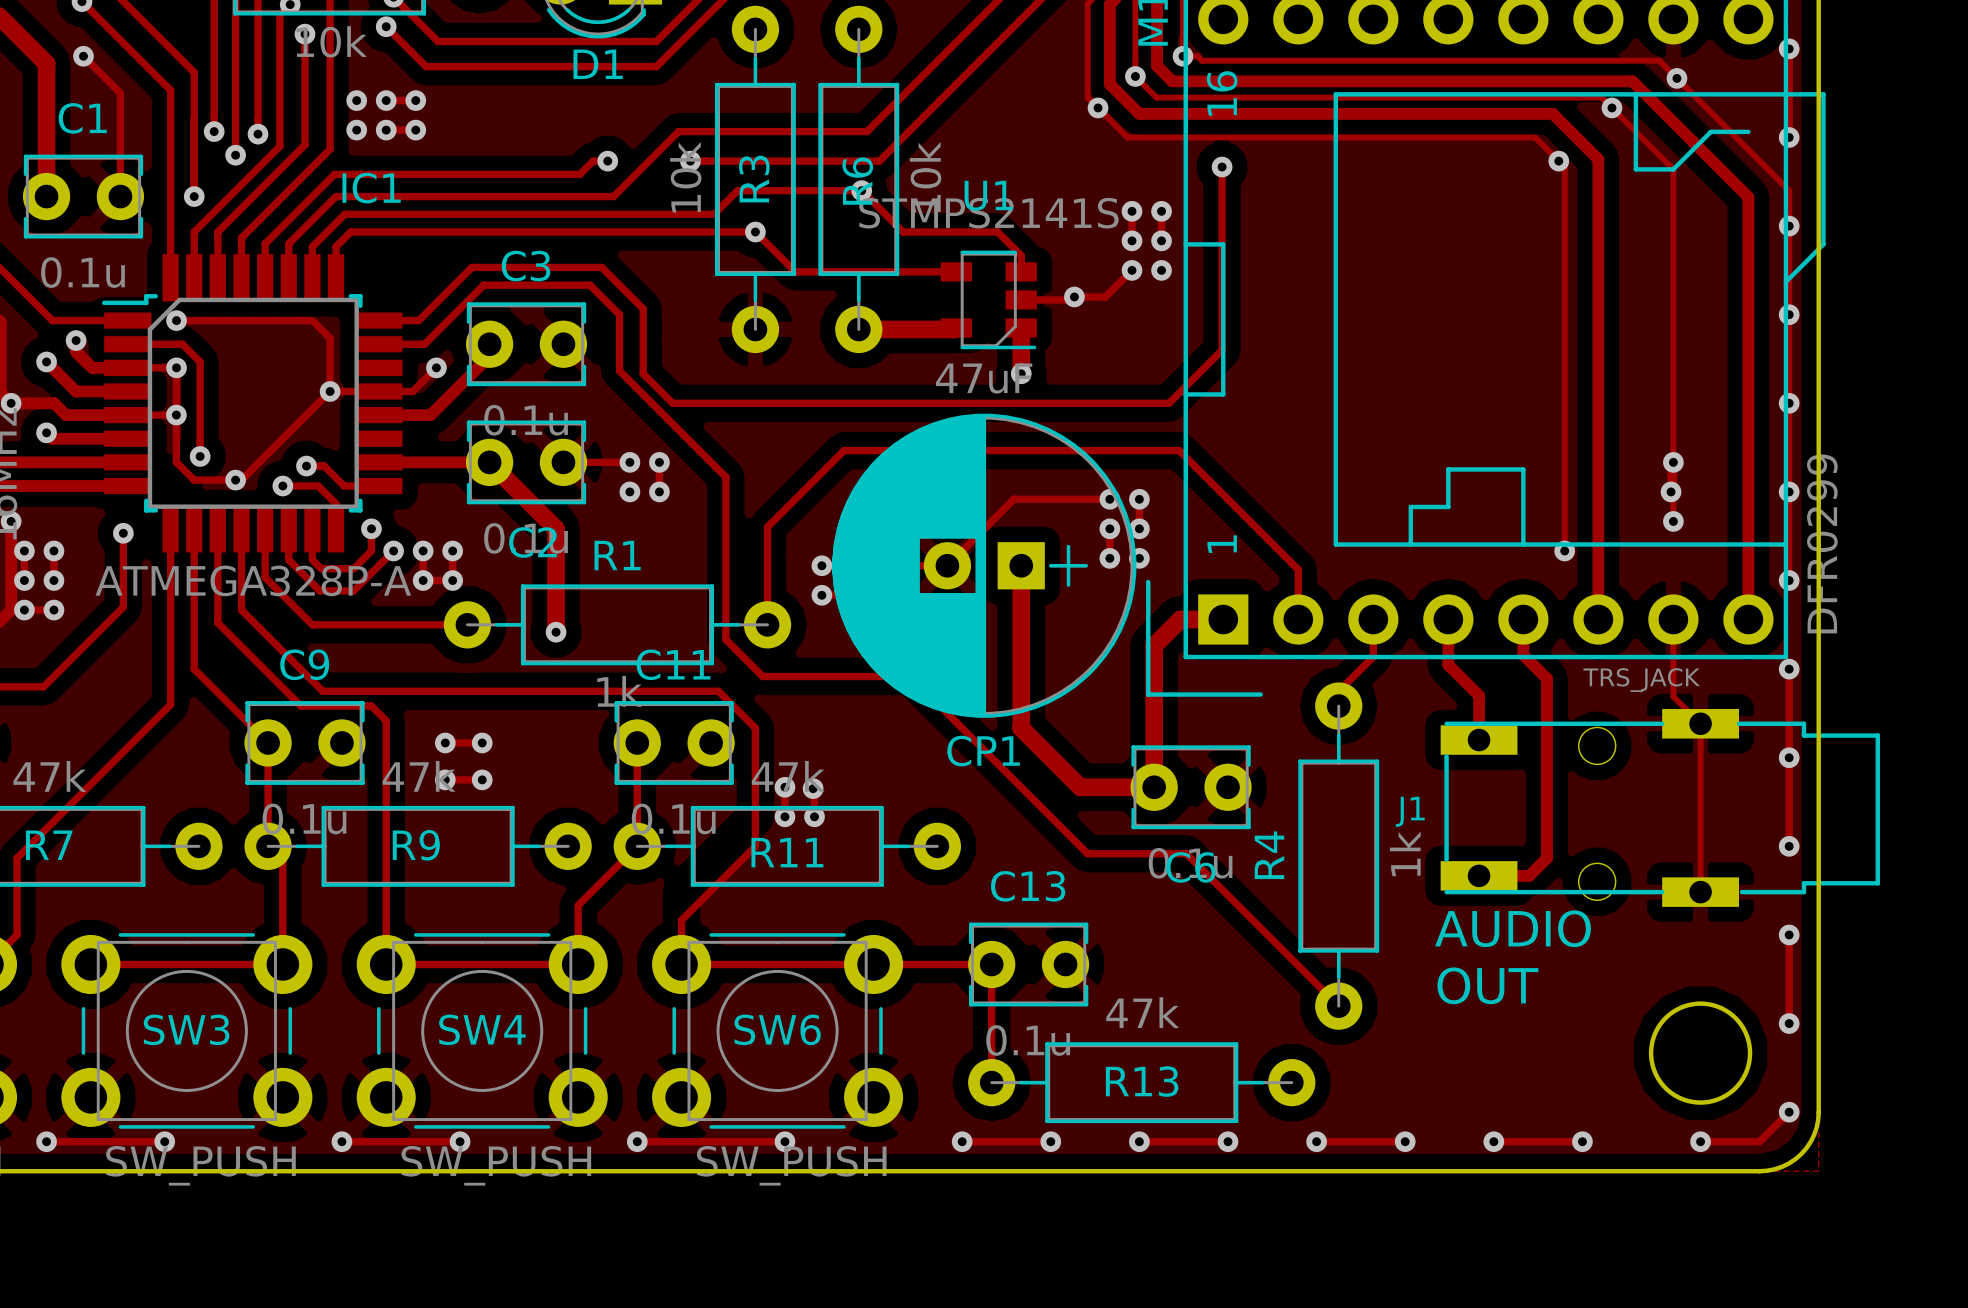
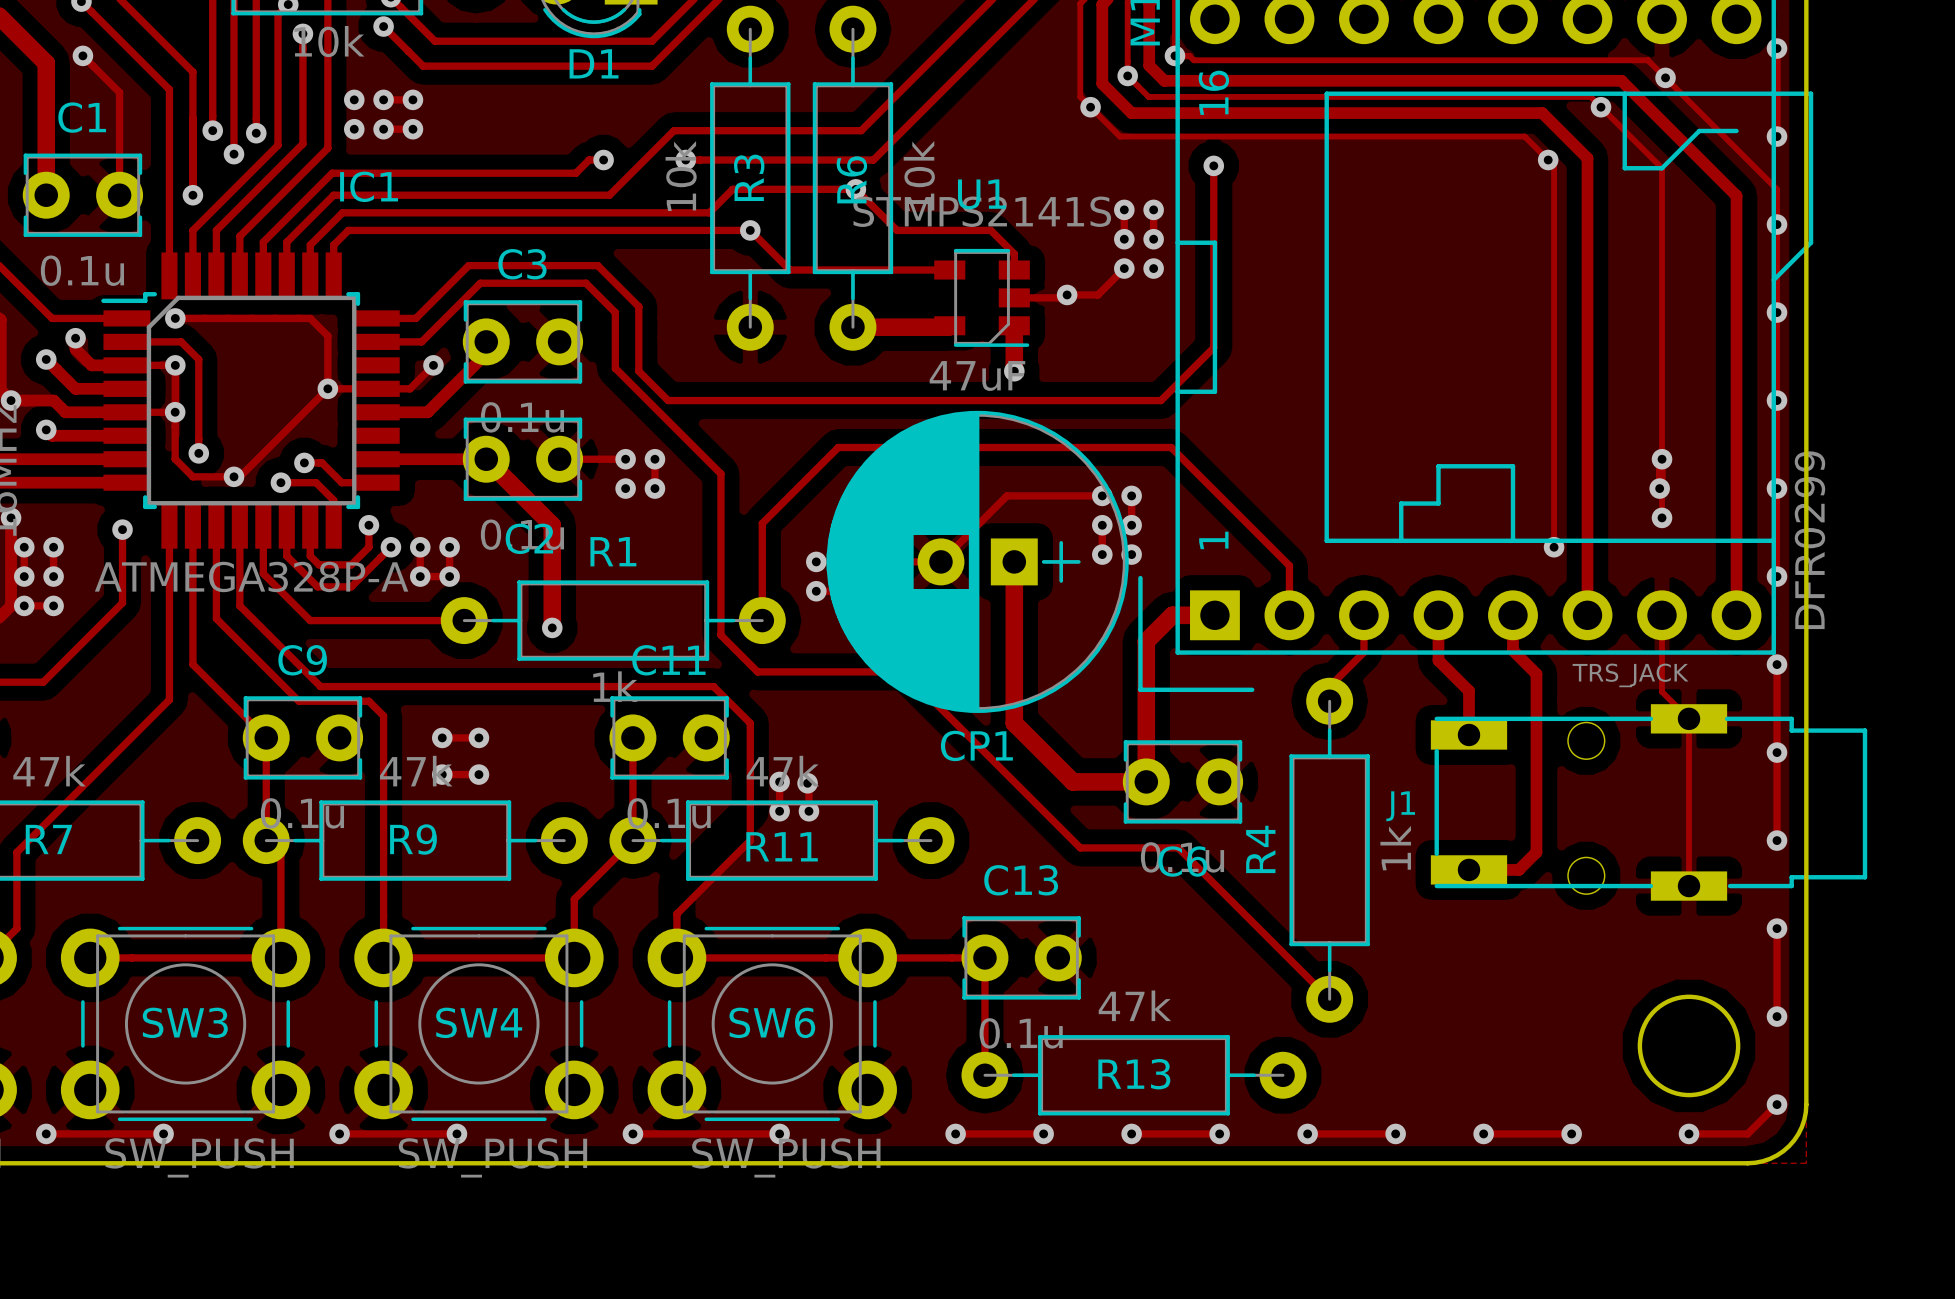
text: AUDIO (1513, 928) -> none
text: OUT (1487, 985) -> none

